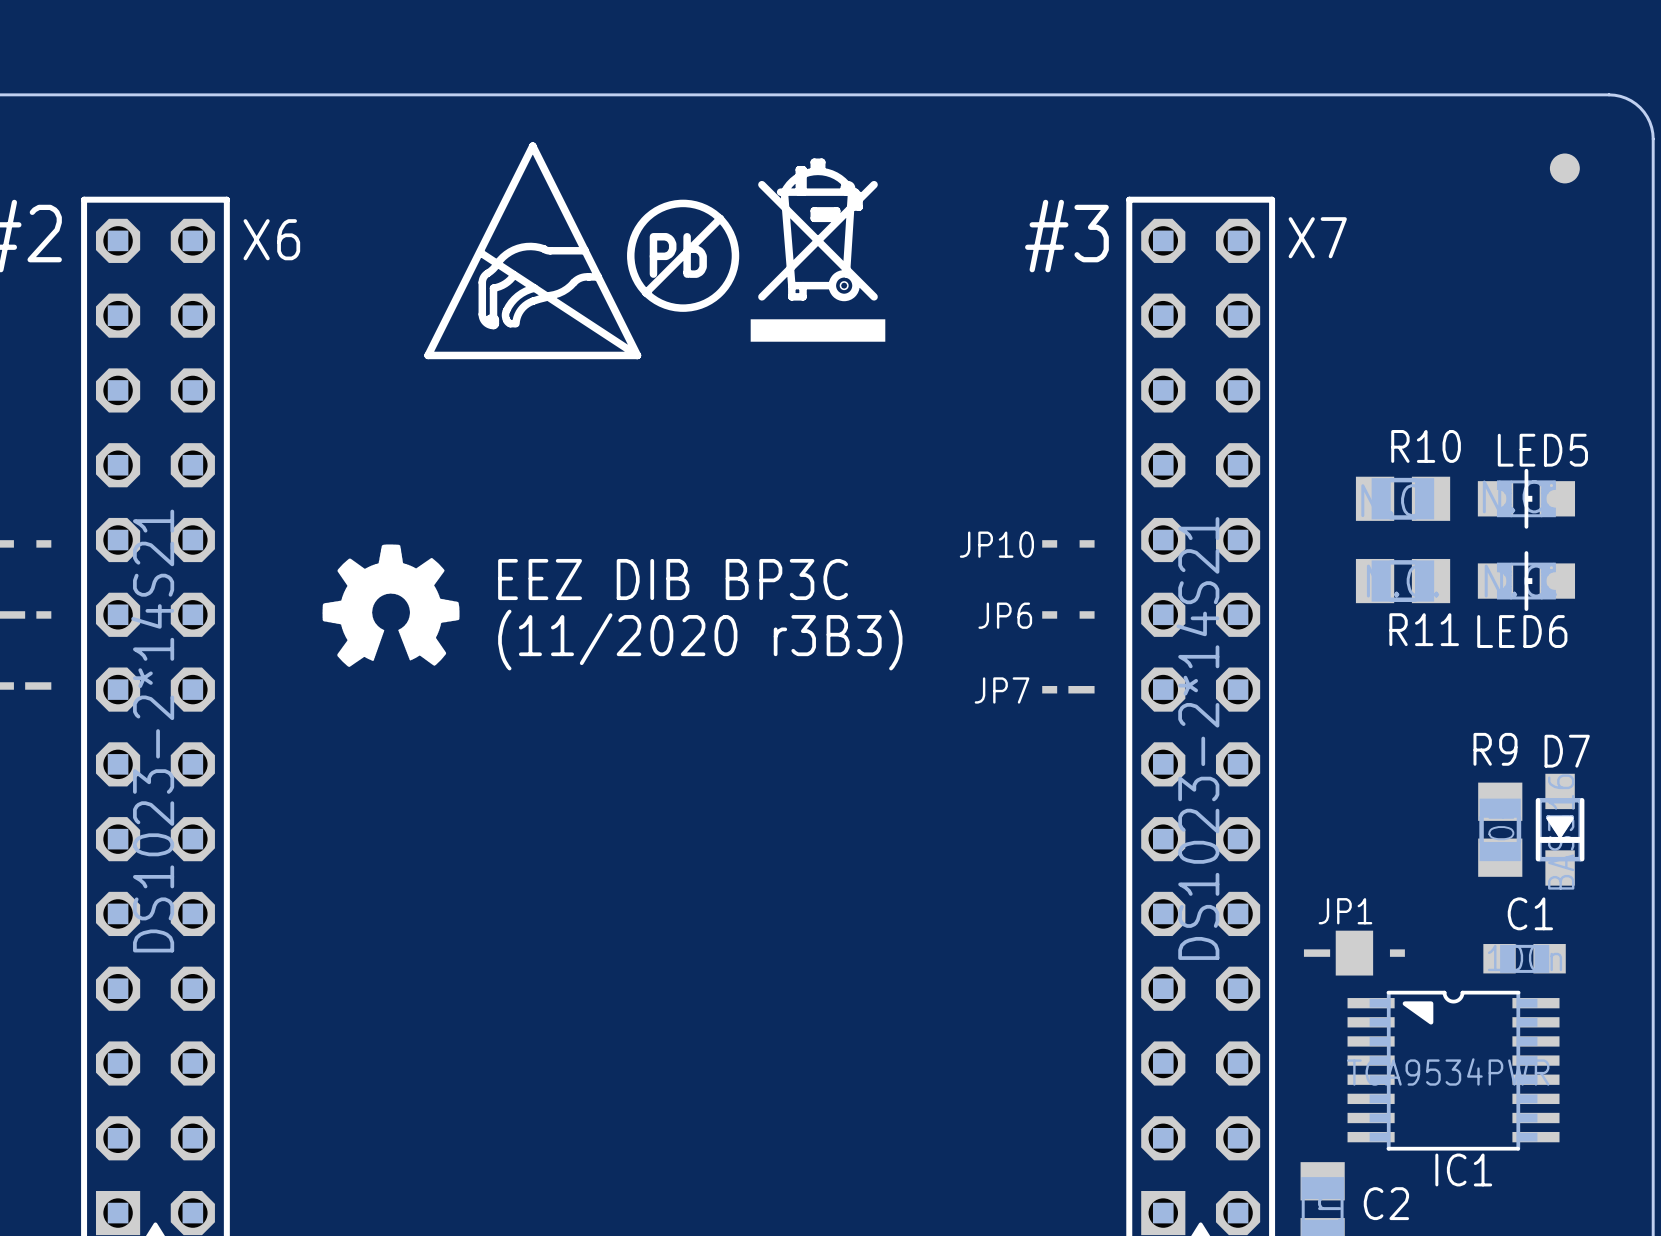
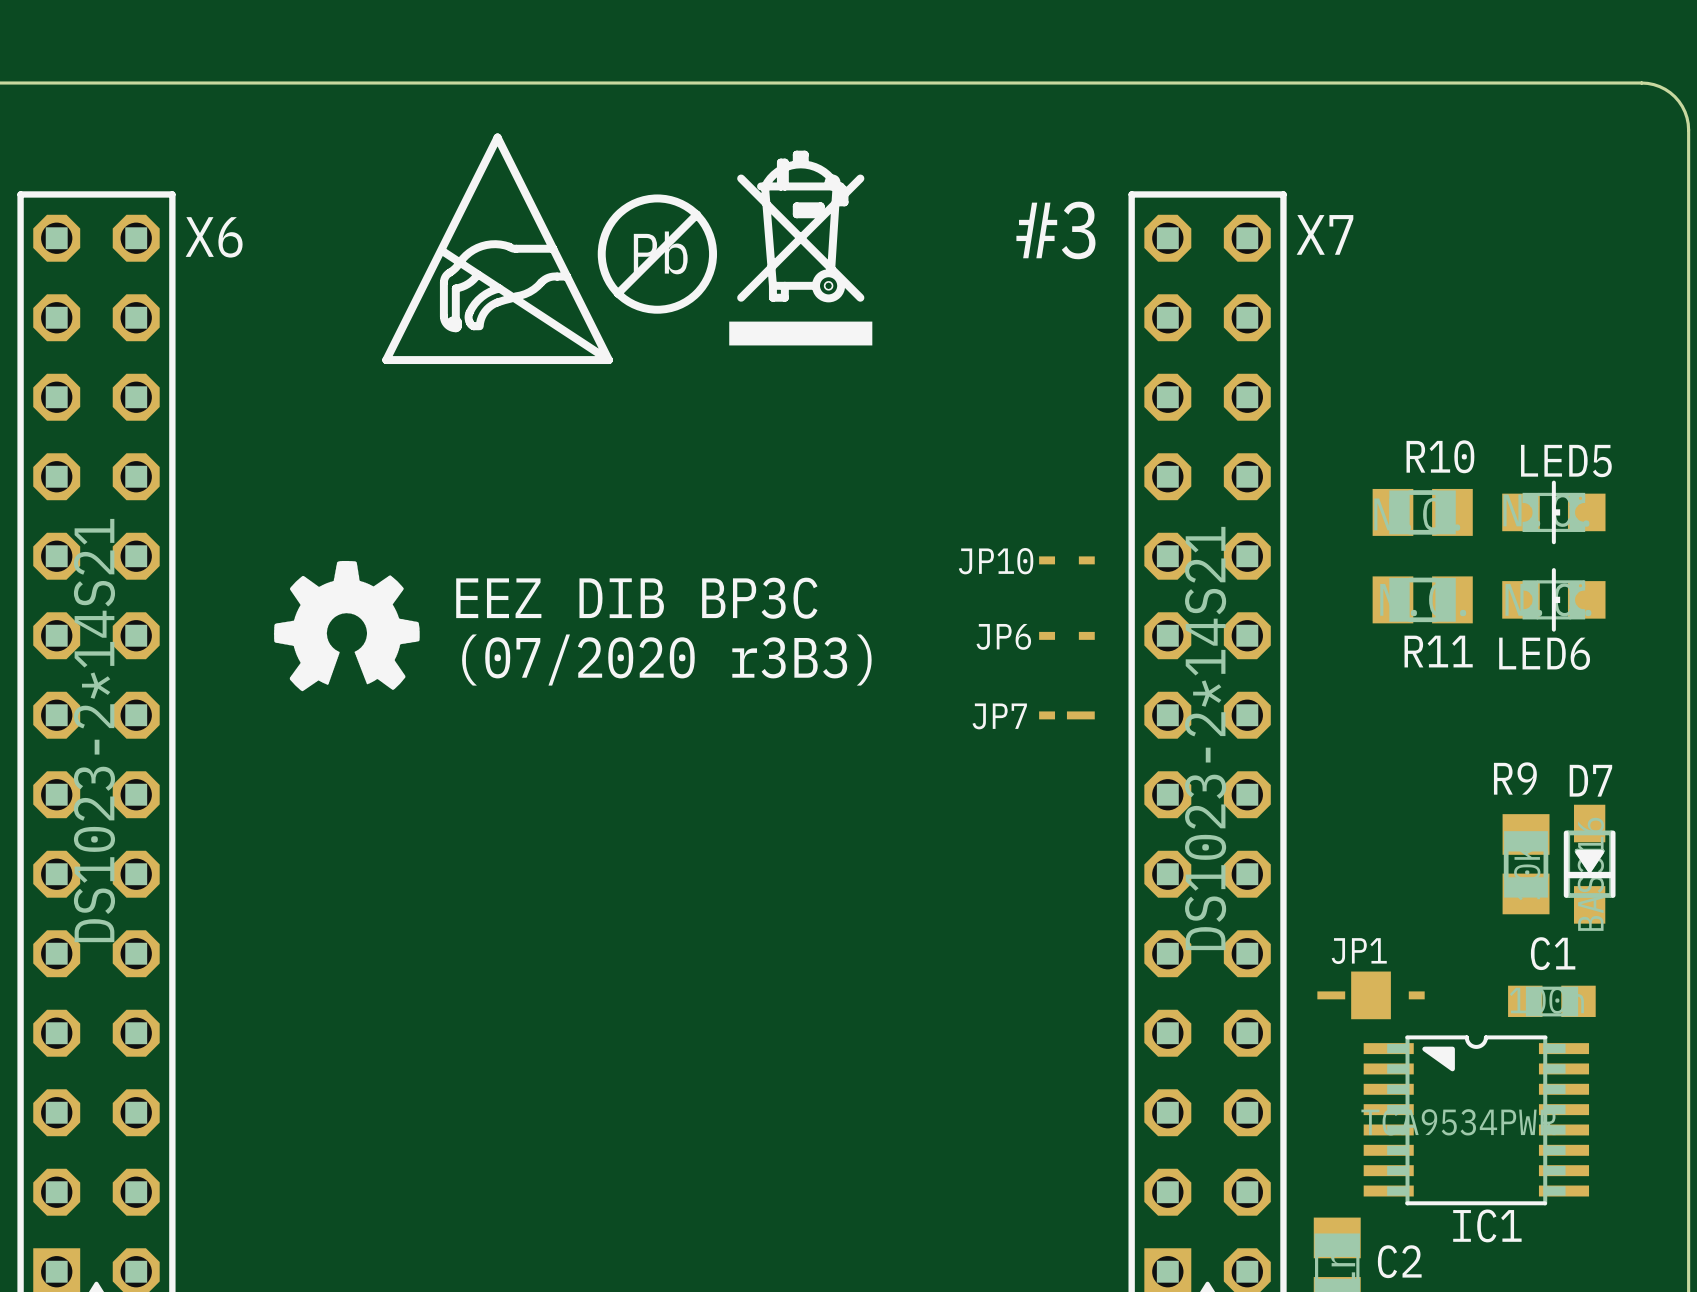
part: (1564, 168) -> none
text: (11/2020 r3B3) (700, 640) -> (07/2020 r3B3) (666, 660)

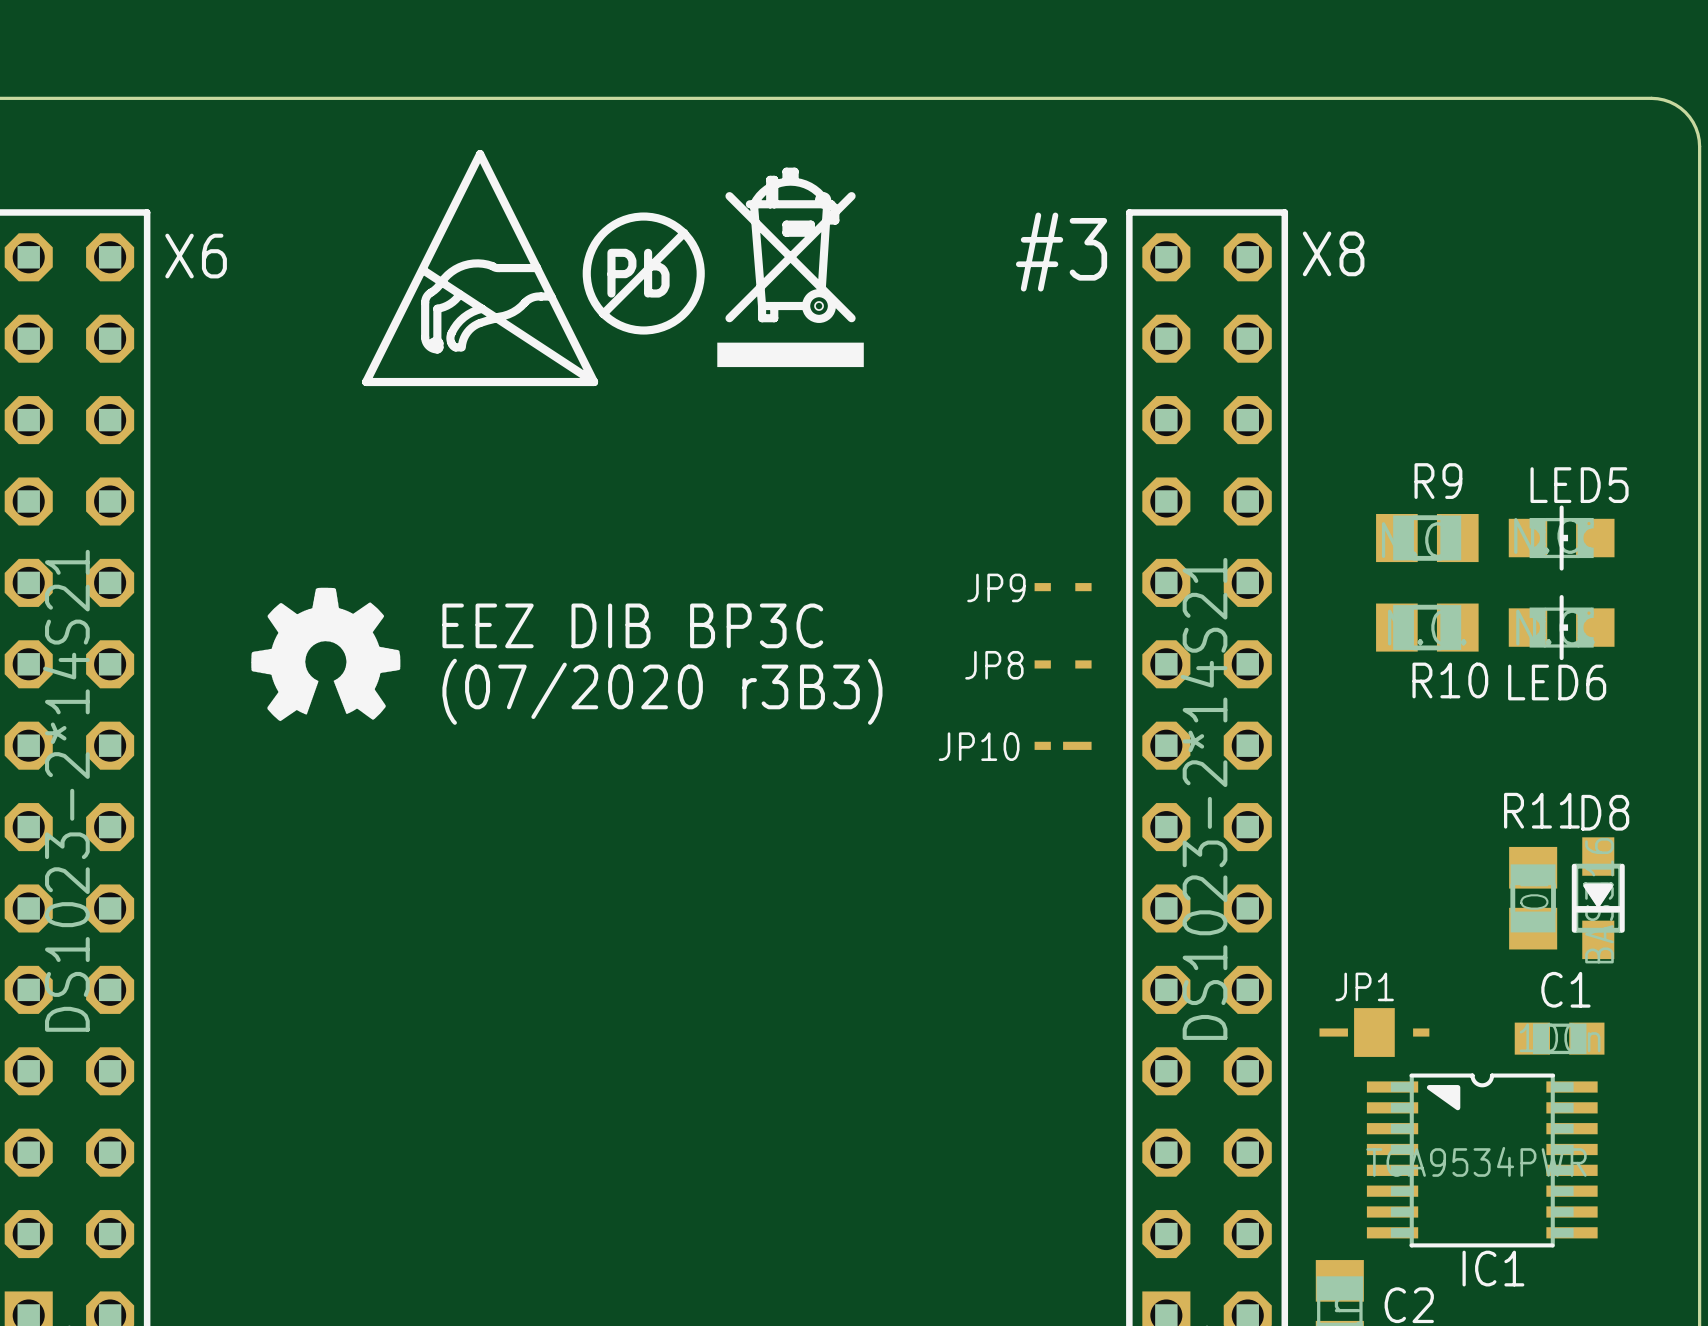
X7 name: X7 (1324, 234) -> X8 (1333, 253)
R10 name: R10 (1440, 456) -> R9 (1438, 481)
JP10 name: JP10 (996, 561) -> JP9 (996, 587)
JP6 name: JP6 (1003, 636) -> JP8 (994, 665)
R11 name: R11 (1438, 651) -> R10 (1450, 680)
JP7 name: JP7 (999, 716) -> JP10 (979, 746)
R9 name: R9 (1515, 778) -> R11 (1541, 810)
D7 name: D7 (1590, 780) -> D8 (1605, 812)

